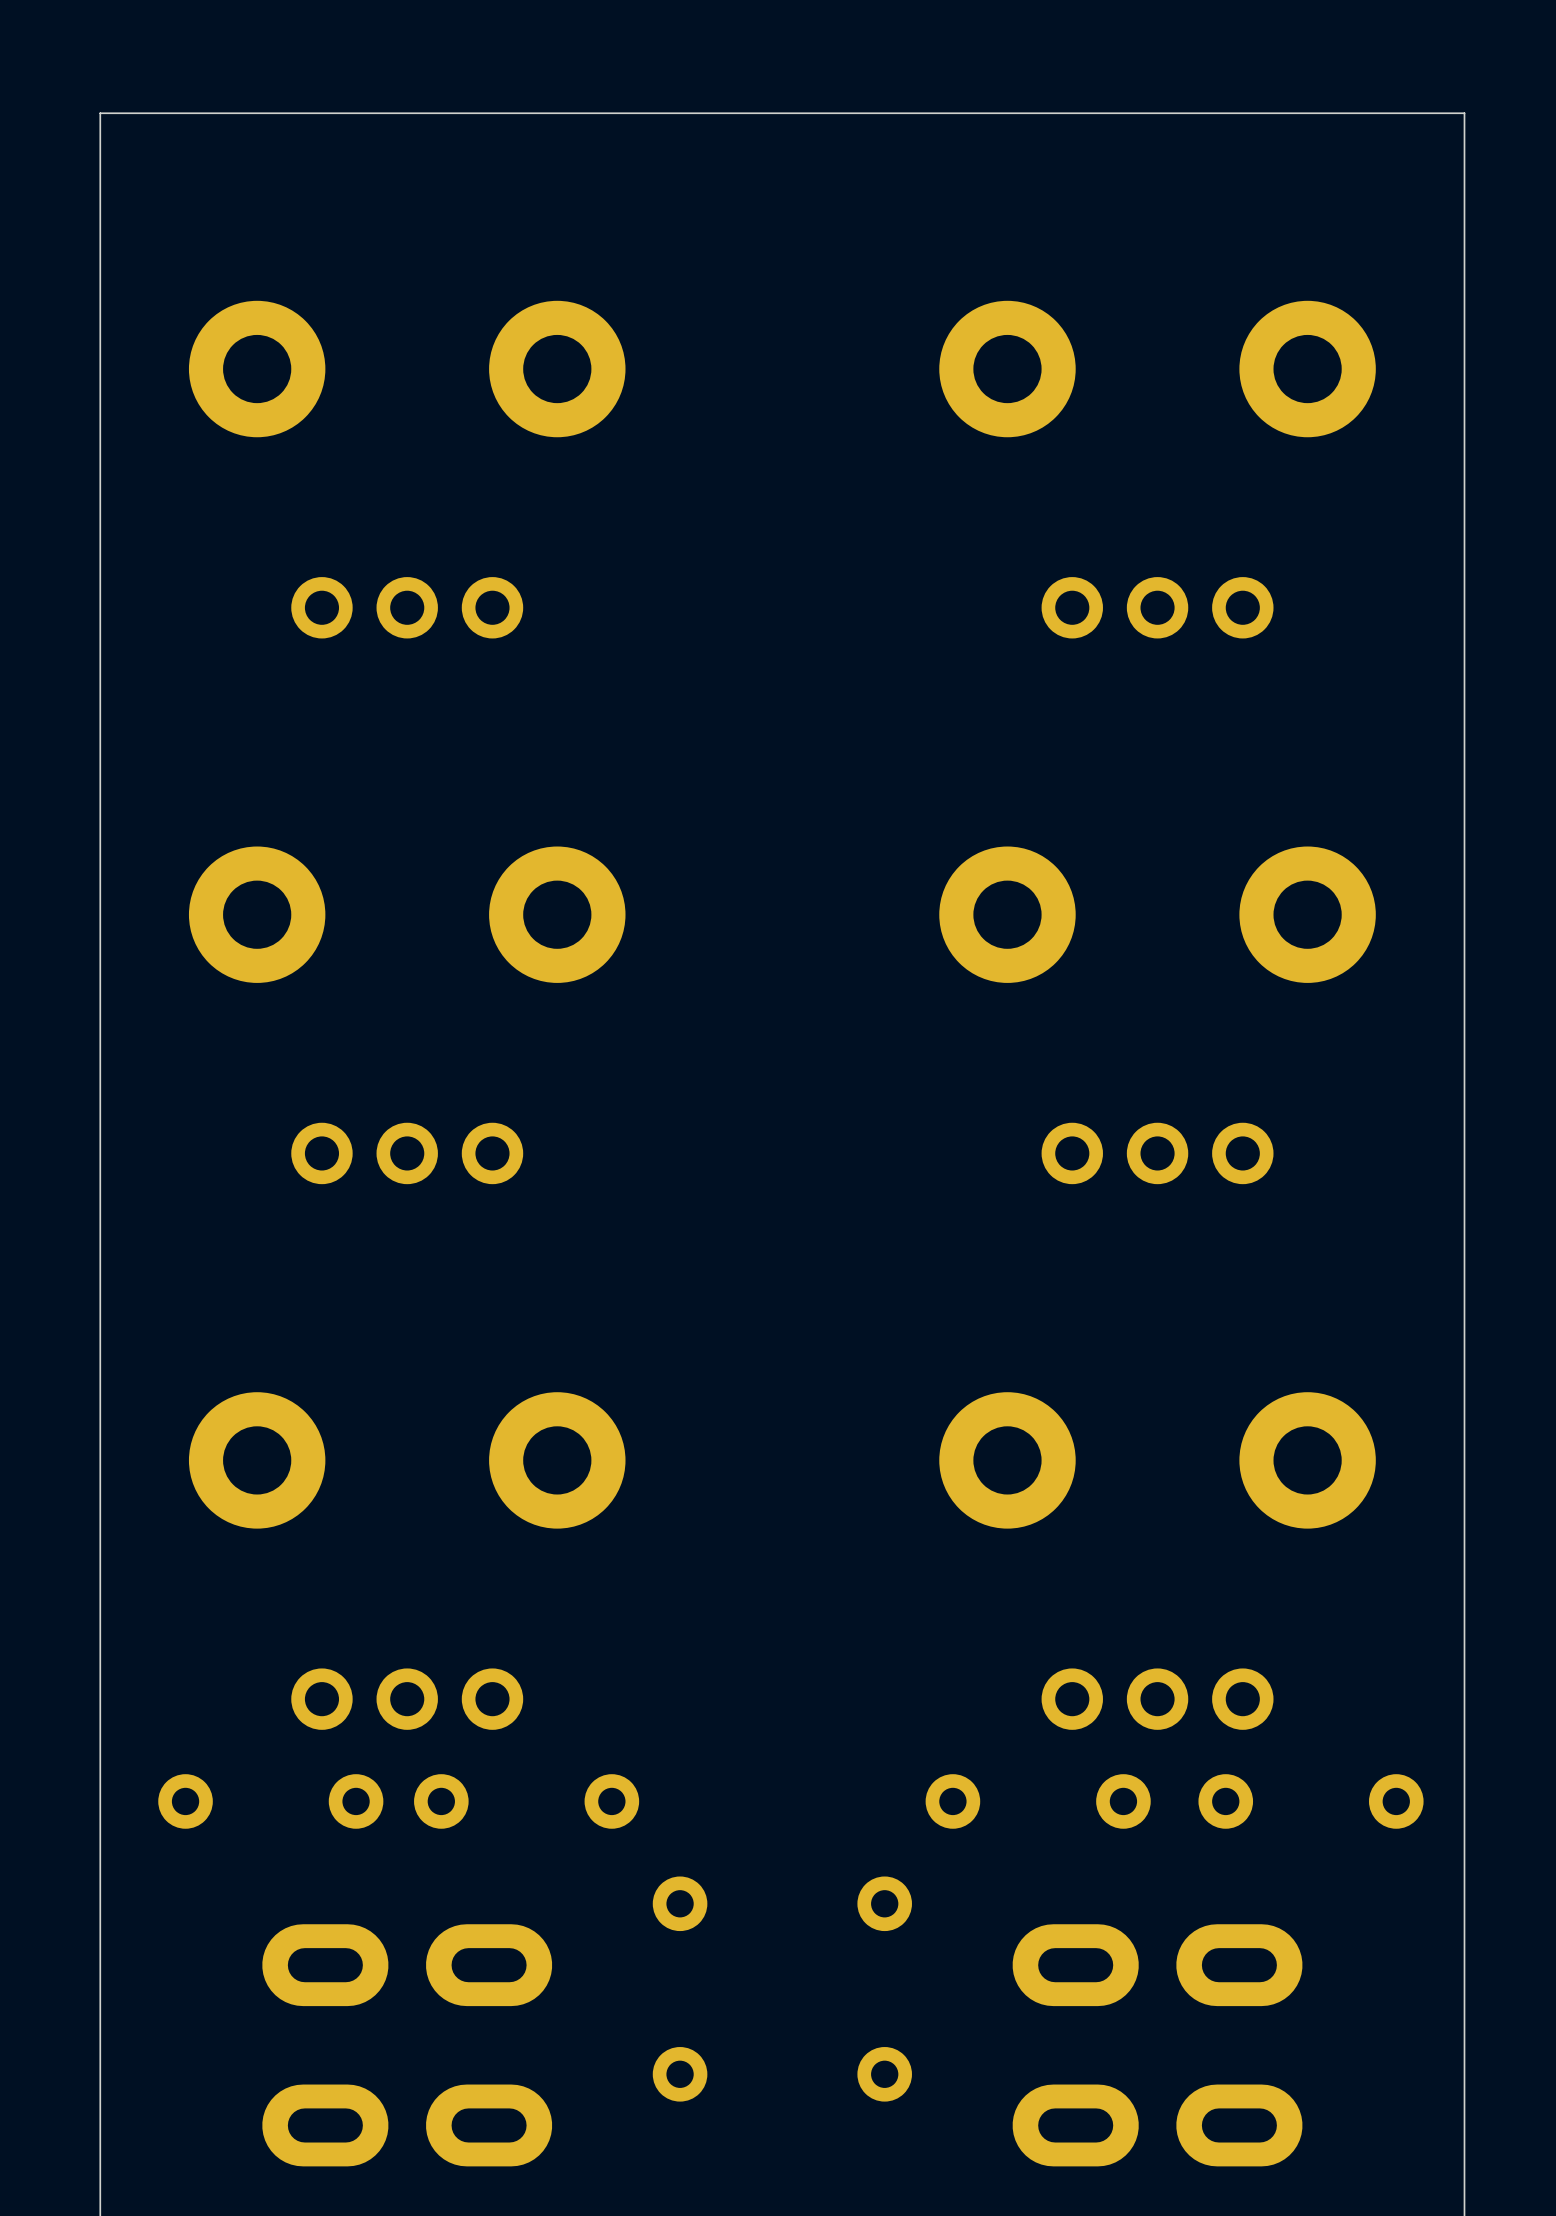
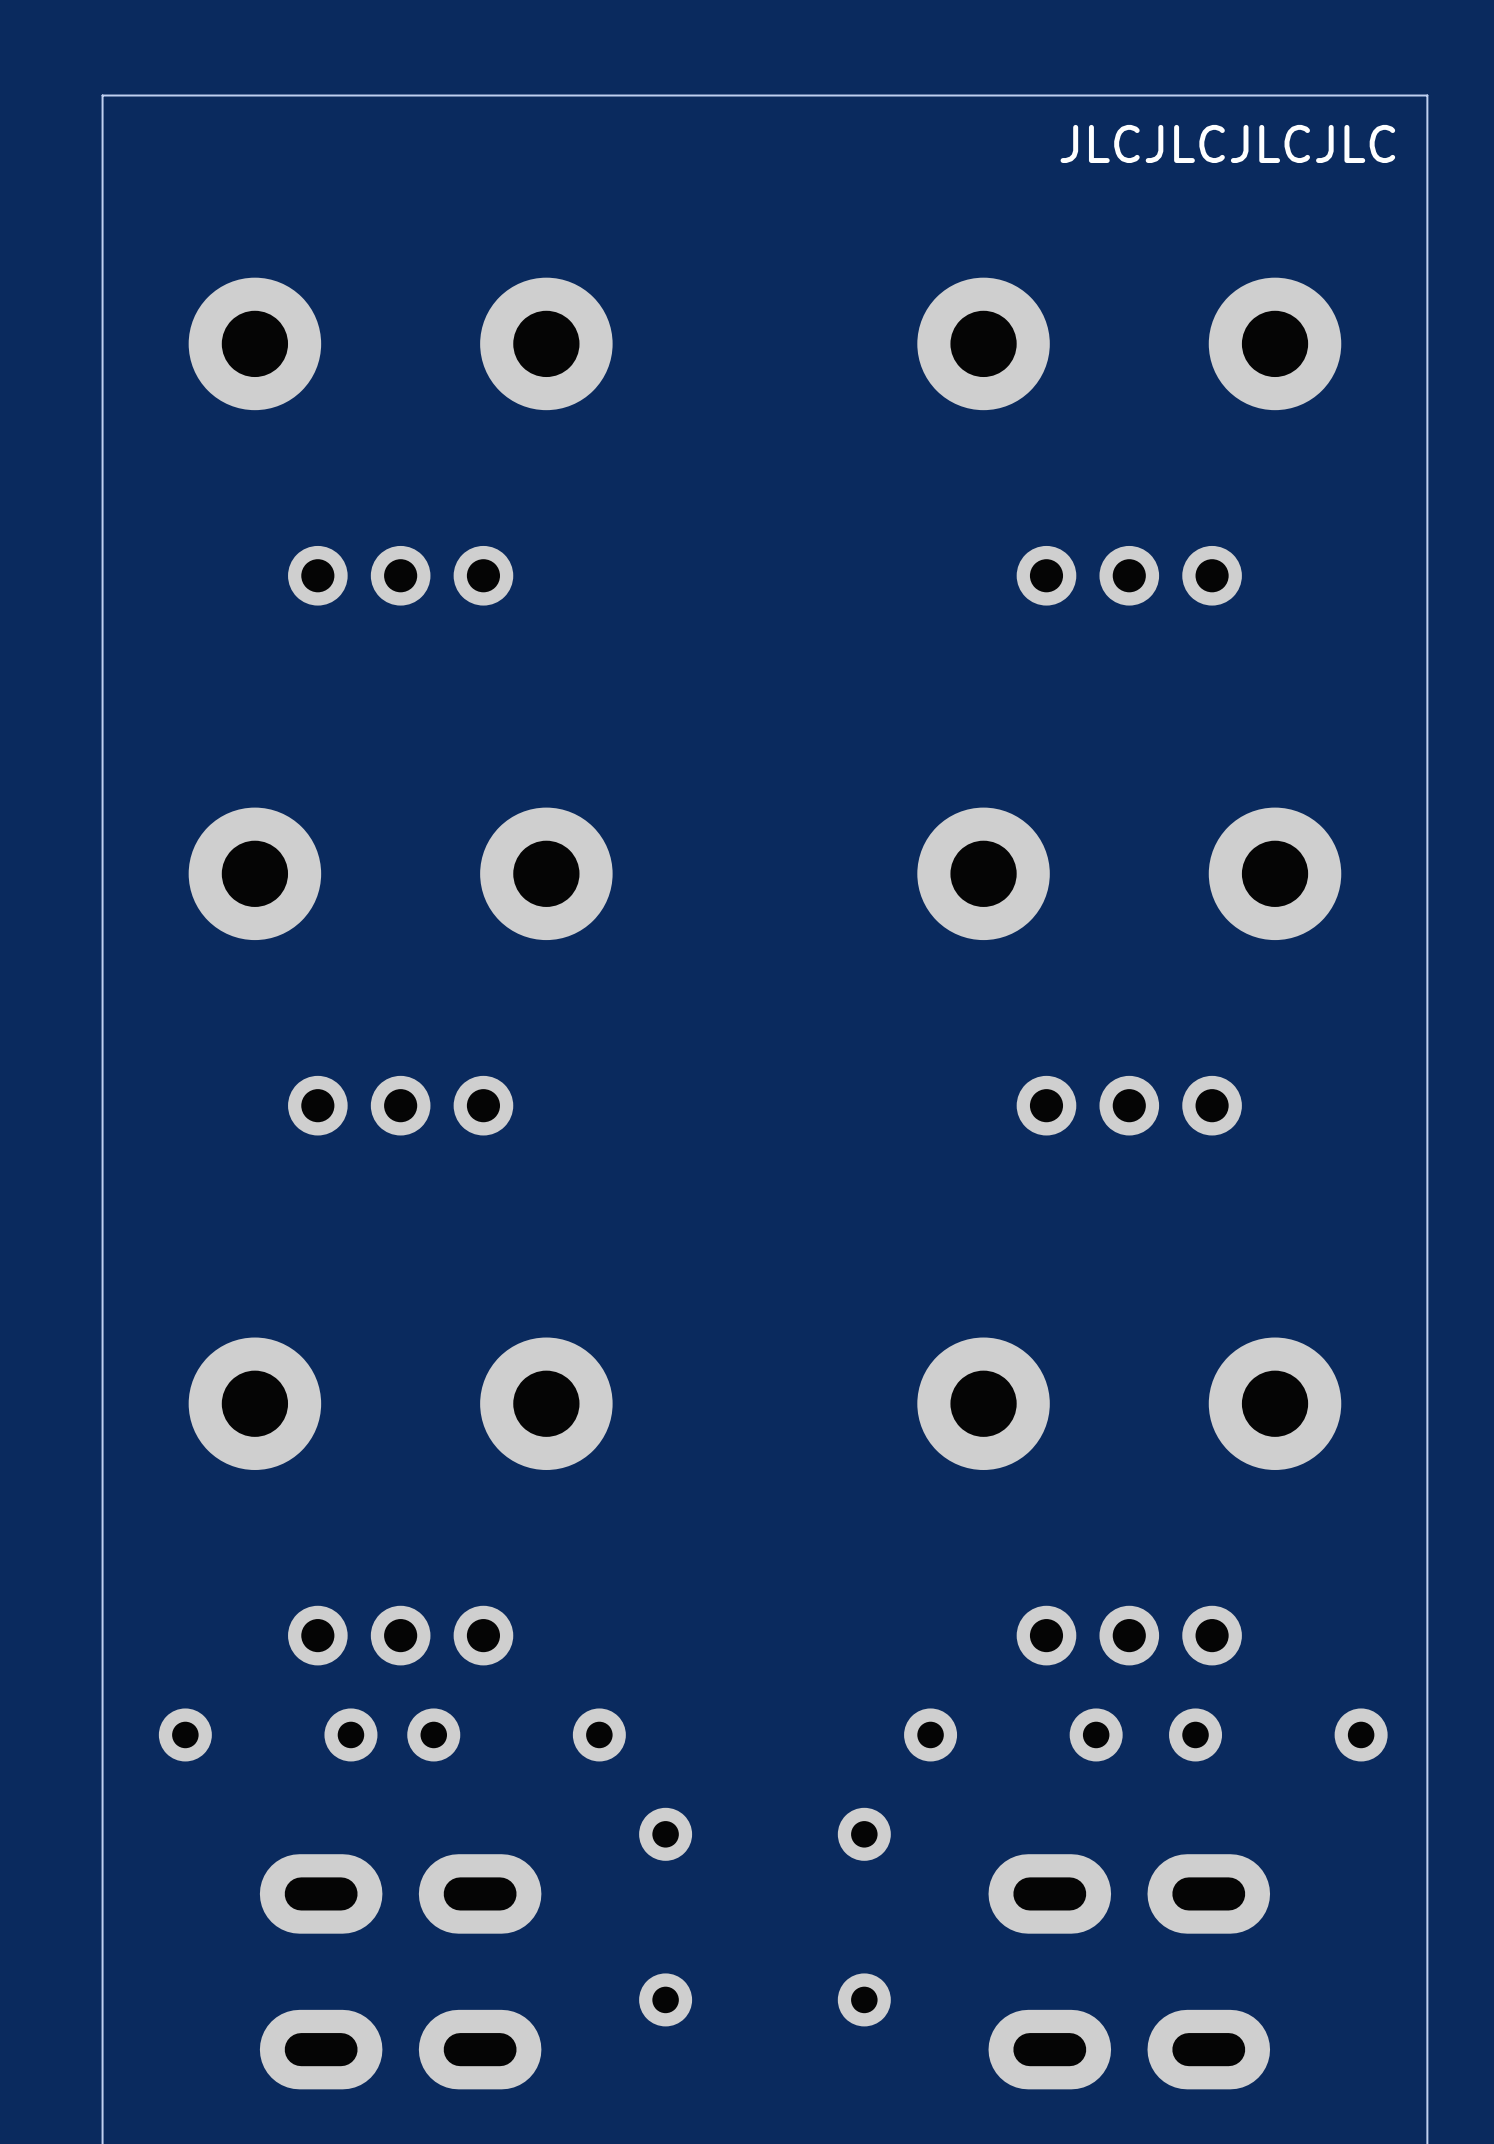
text: none -> JLCJLCJLCJLC (1227, 143)

